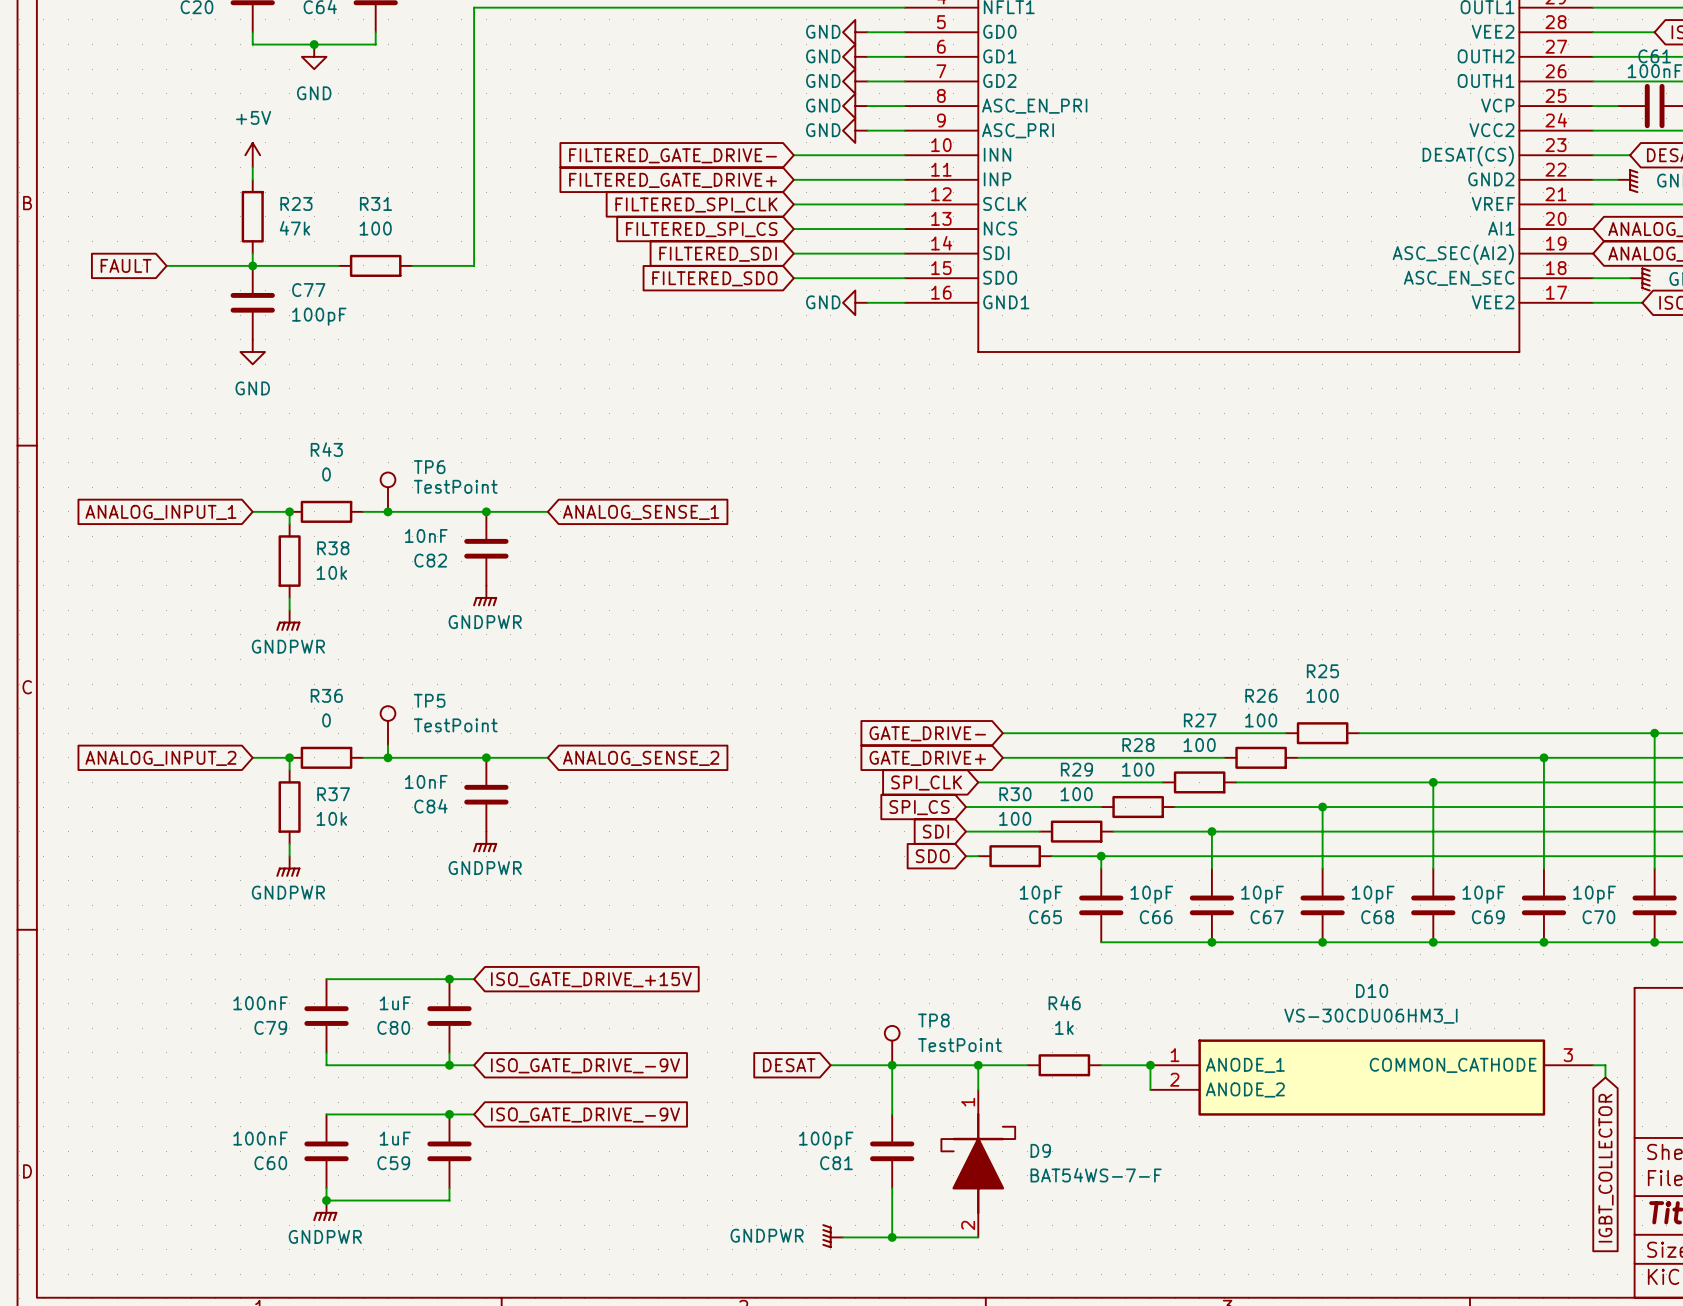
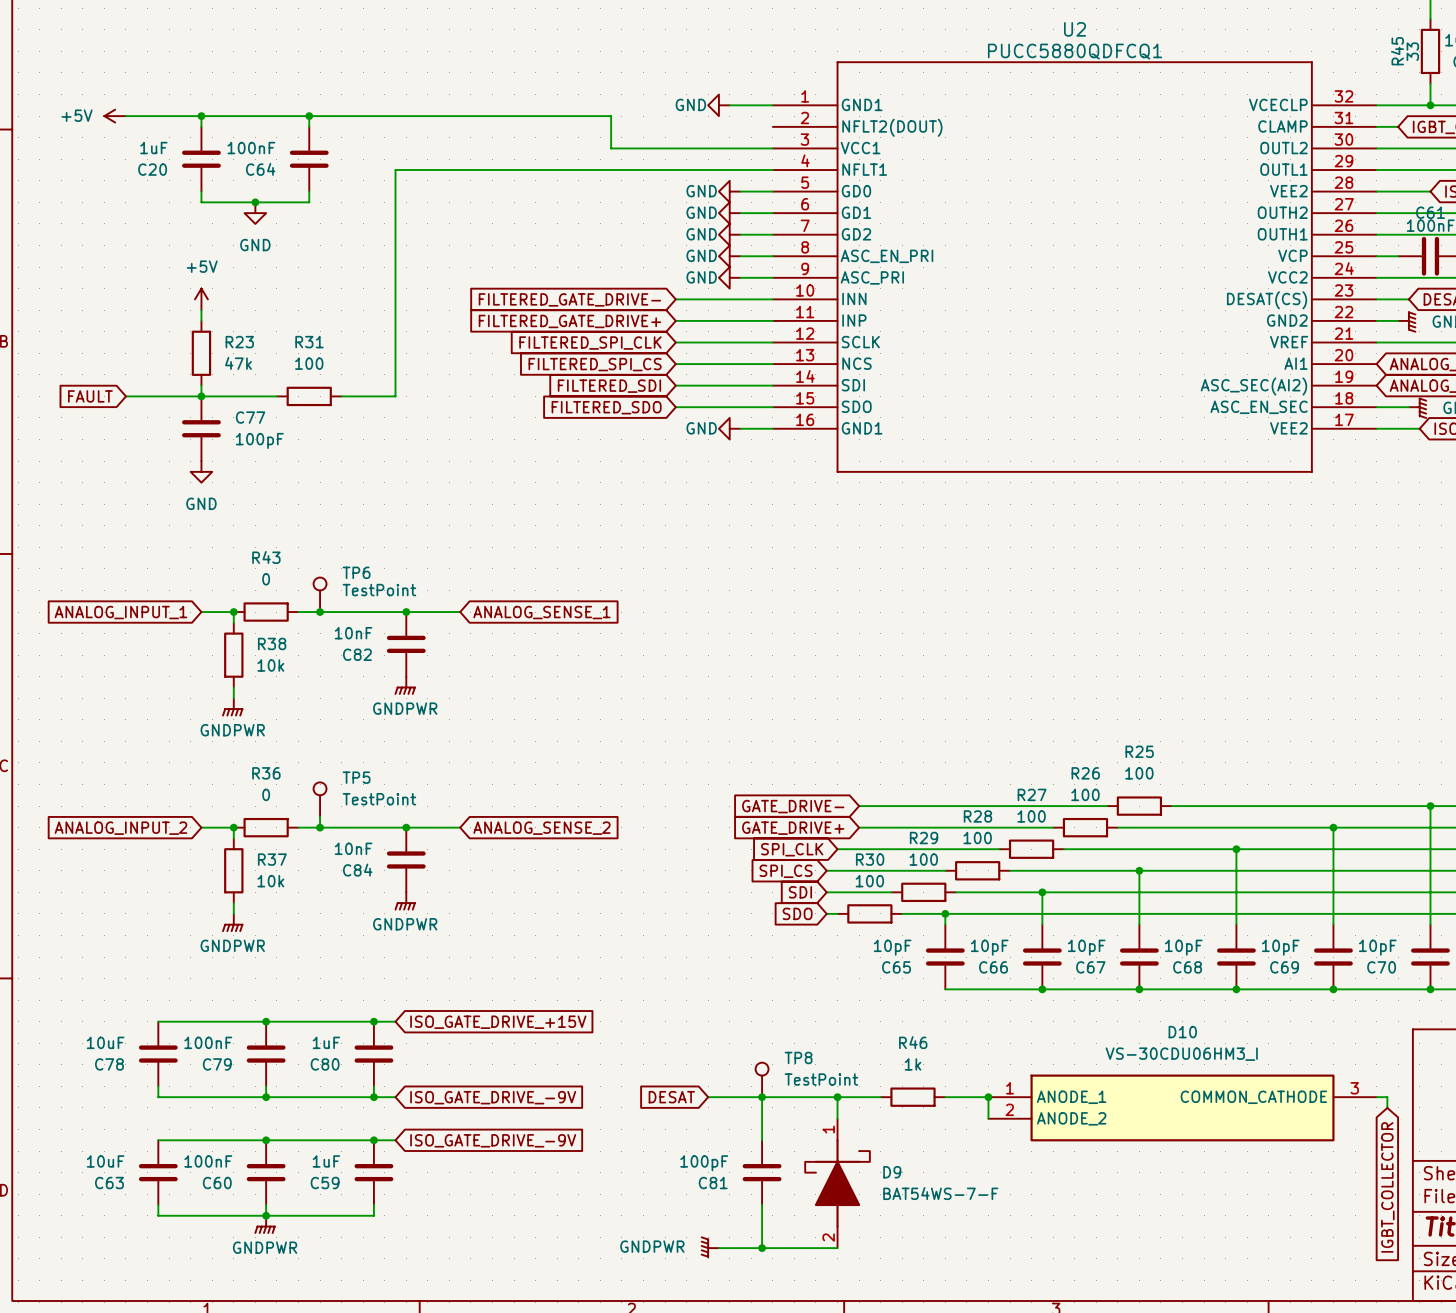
wire: none -> (158, 1021) (266, 1021)
junction: none -> (266, 1021)
C78: none -> 10uF (158, 1054)
wire: none -> (158, 1086) (158, 1097) (266, 1097)
junction: none -> (266, 1097)
wire: none -> (158, 1140) (266, 1140)
junction: none -> (266, 1140)
C63: none -> 10uF (158, 1172)
wire: none -> (158, 1204) (158, 1215) (266, 1215)

